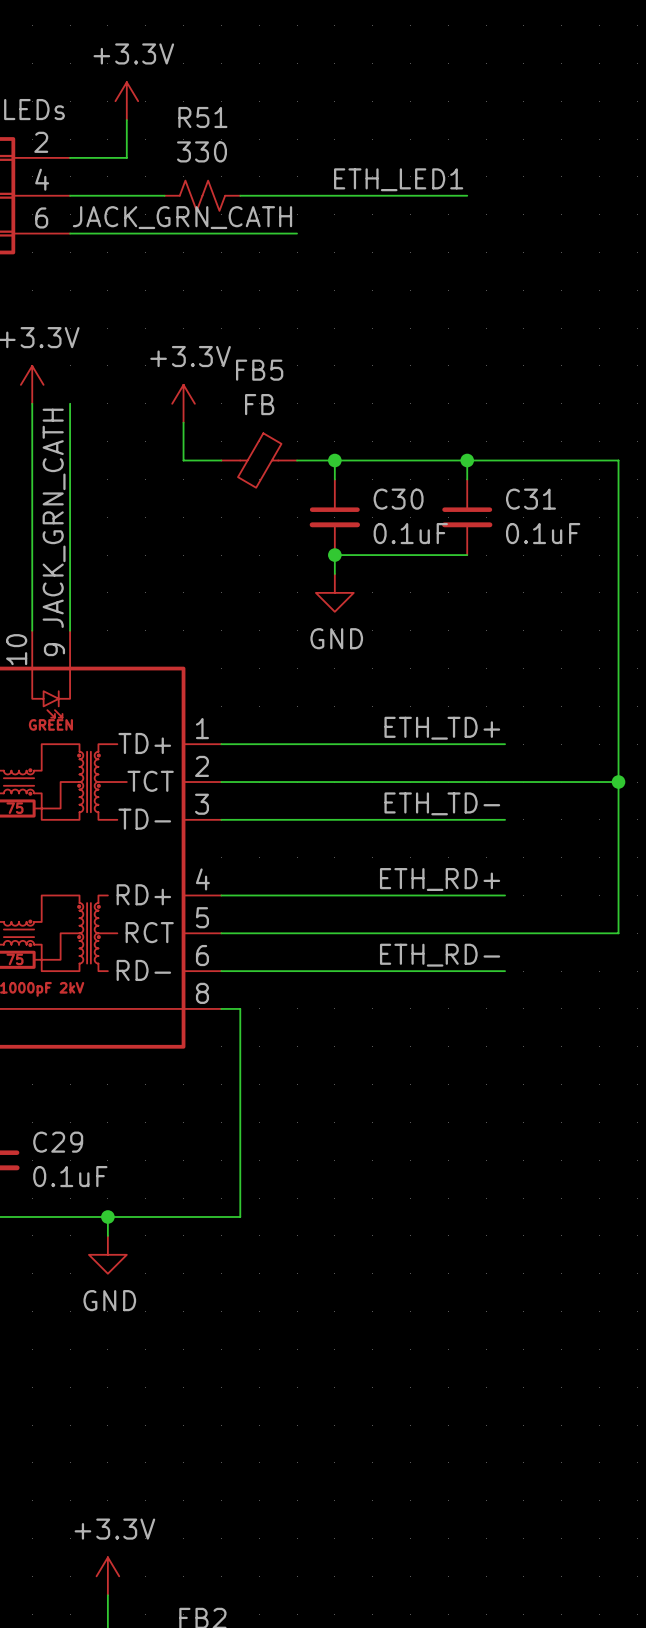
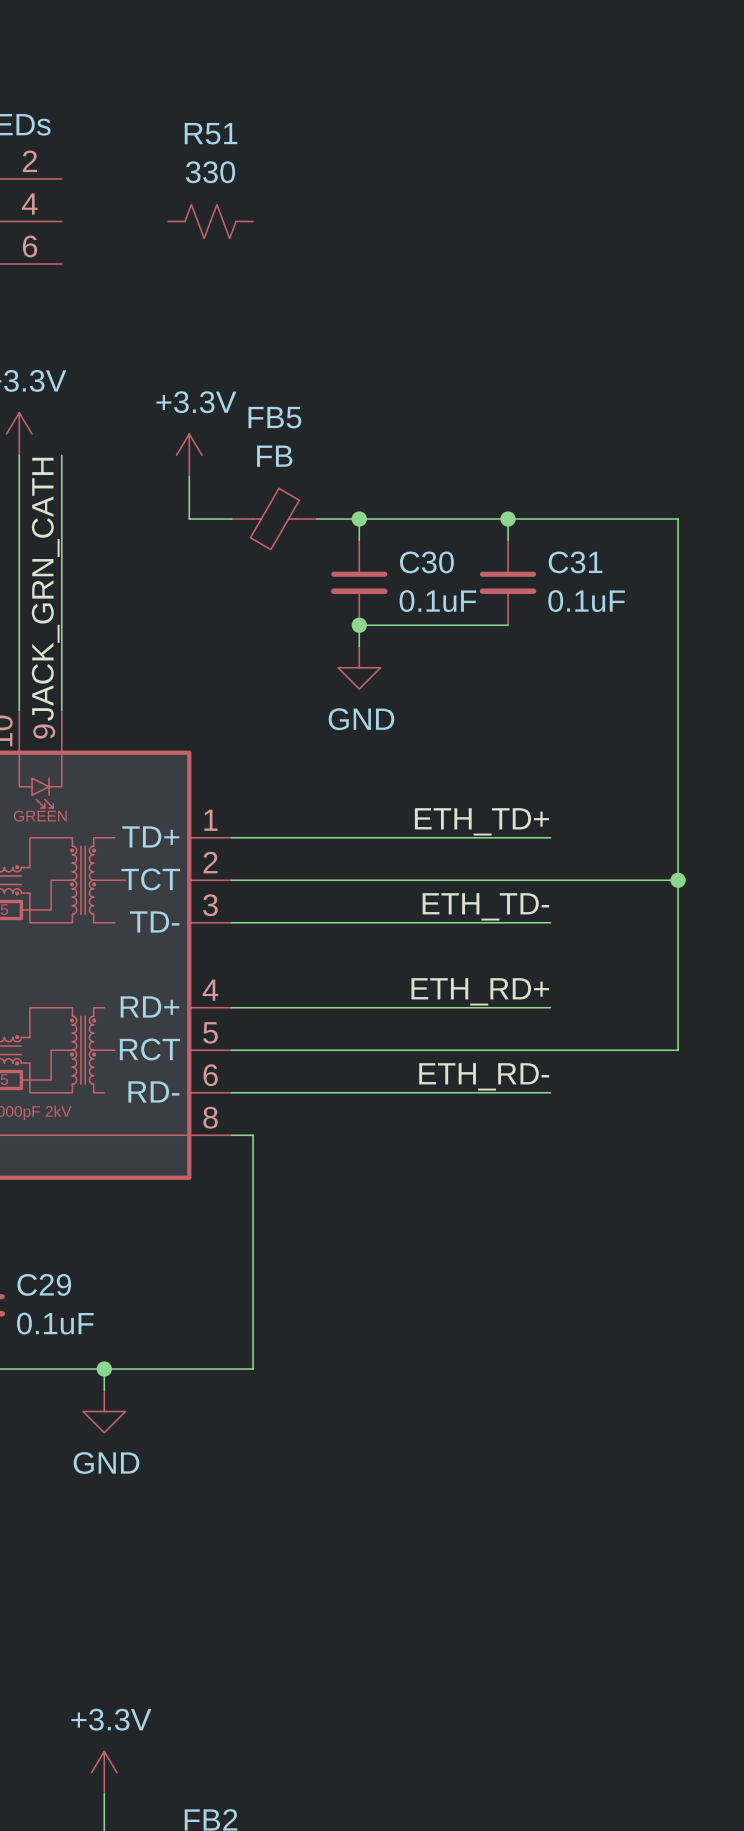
power symbol: +3.3V (126, 101) -> none
wire: (126, 120) (126, 157) (70, 157) -> none
label: ETH_LED1 (398, 179) -> none
wire: (70, 195) (164, 195) -> none
wire: (240, 195) (467, 195) -> none
label: JACK_GRN_CATH (182, 217) -> none
wire: (70, 233) (297, 233) -> none

